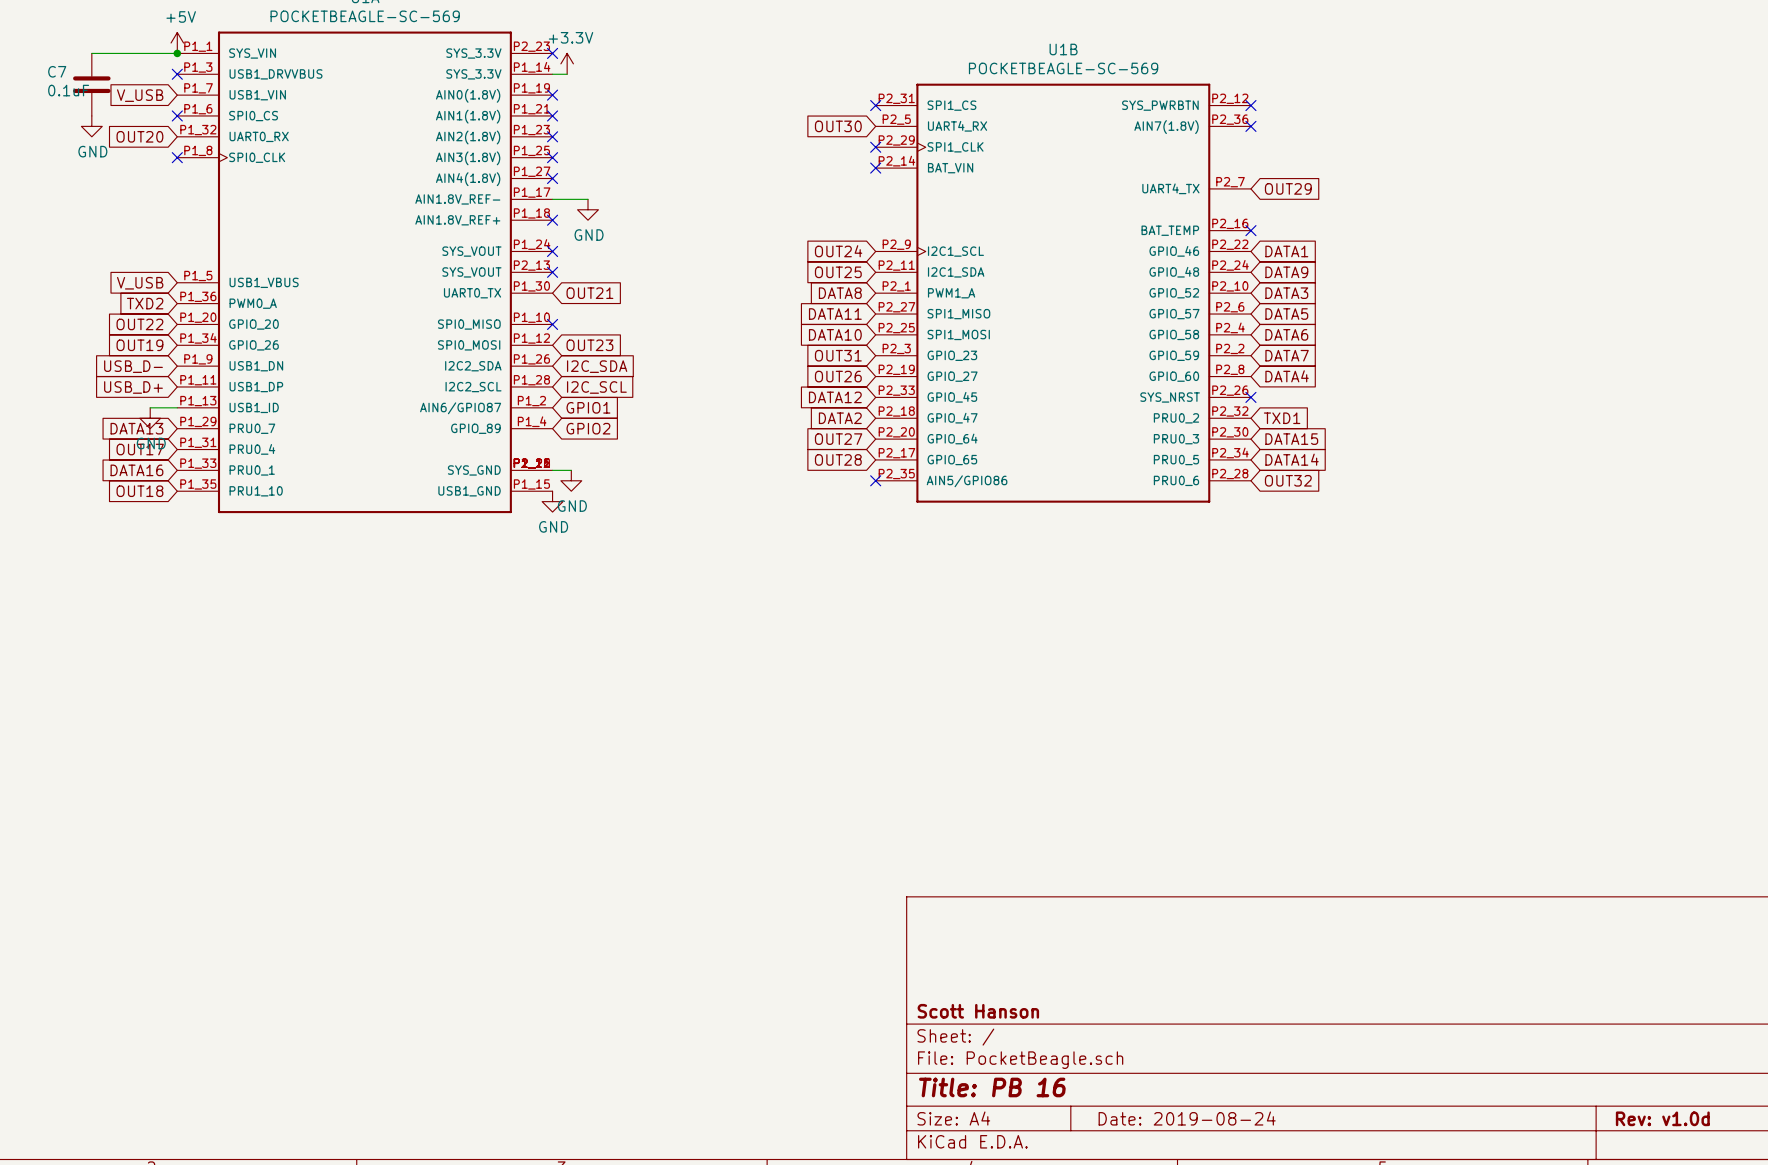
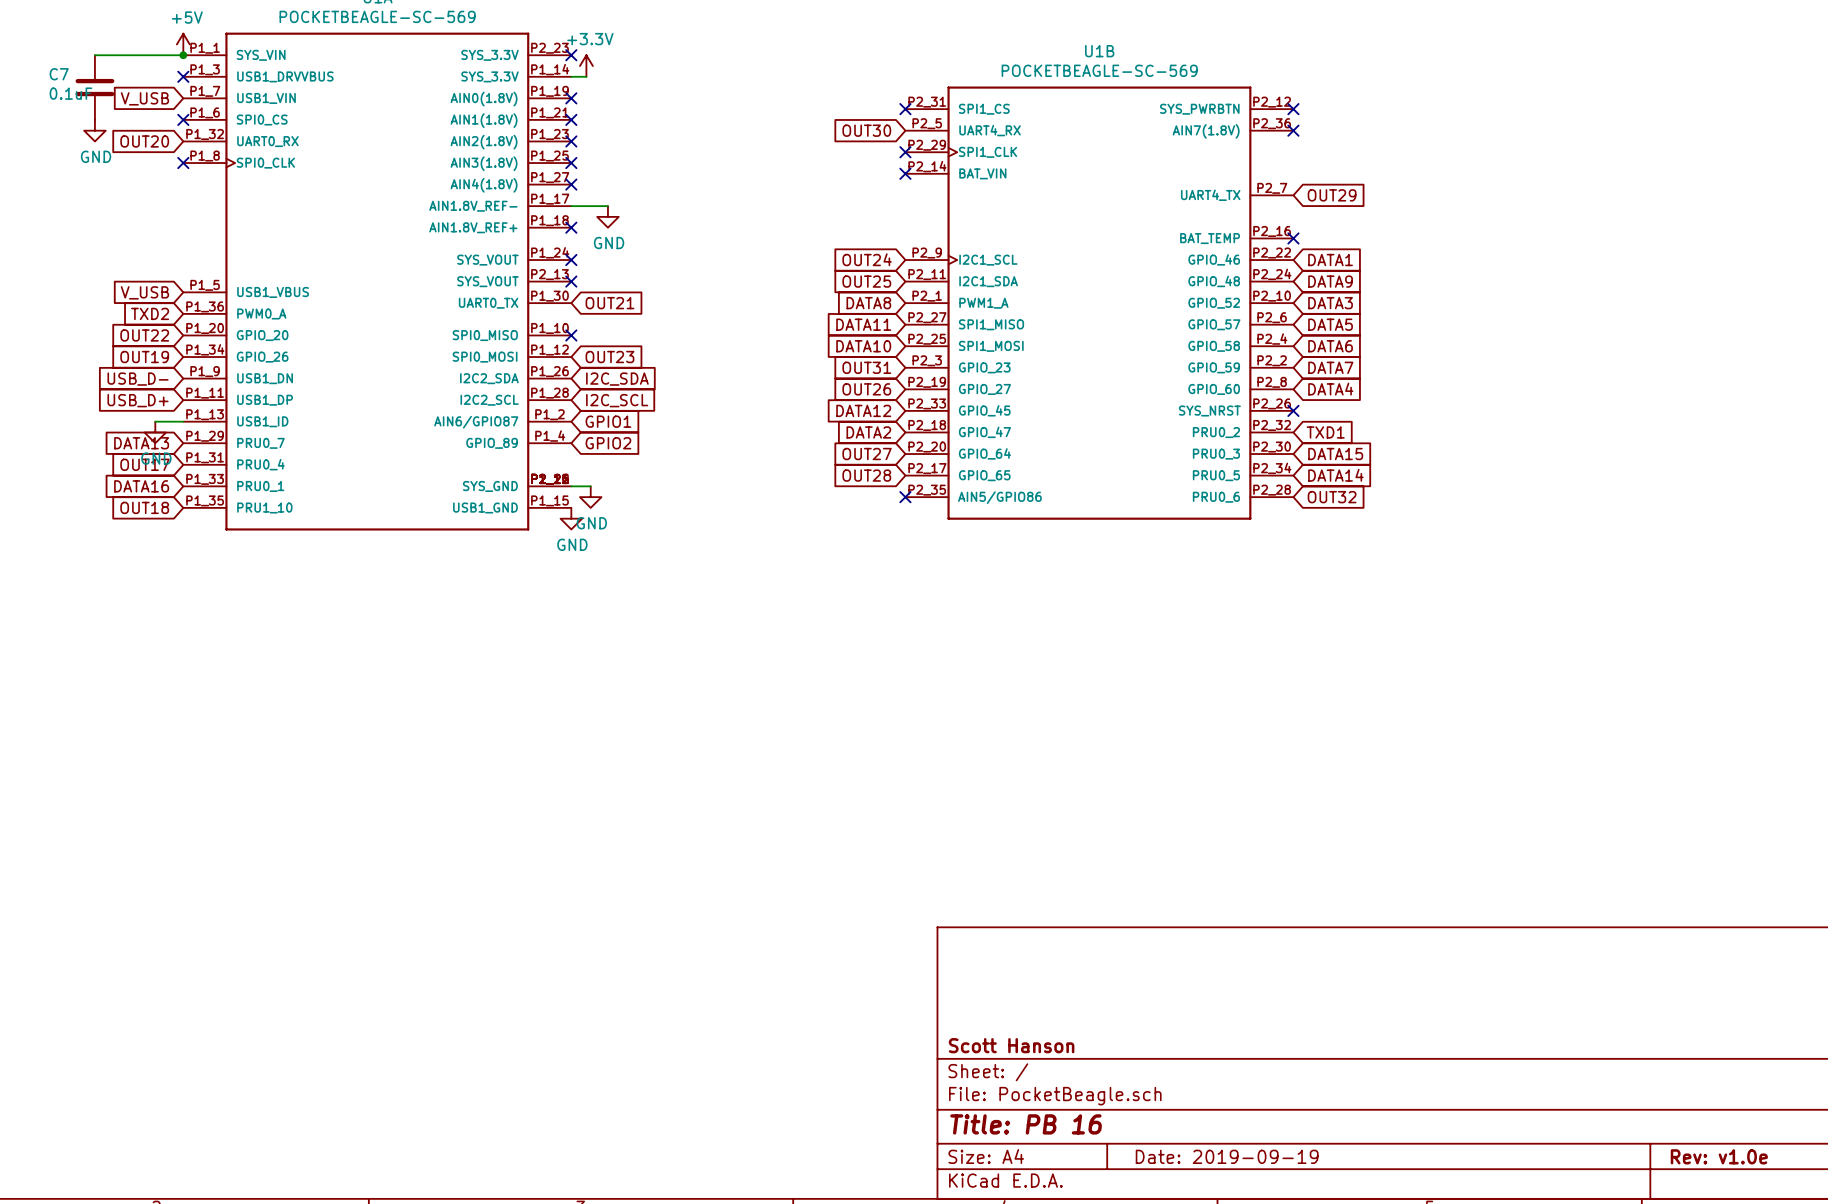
title block: Date: 2019-08-24 (1187, 1118) -> Date: 2019-09-19 (1227, 1156)
title block: Rev: v1.0d (1662, 1118) -> Rev: v1.0e (1719, 1156)

